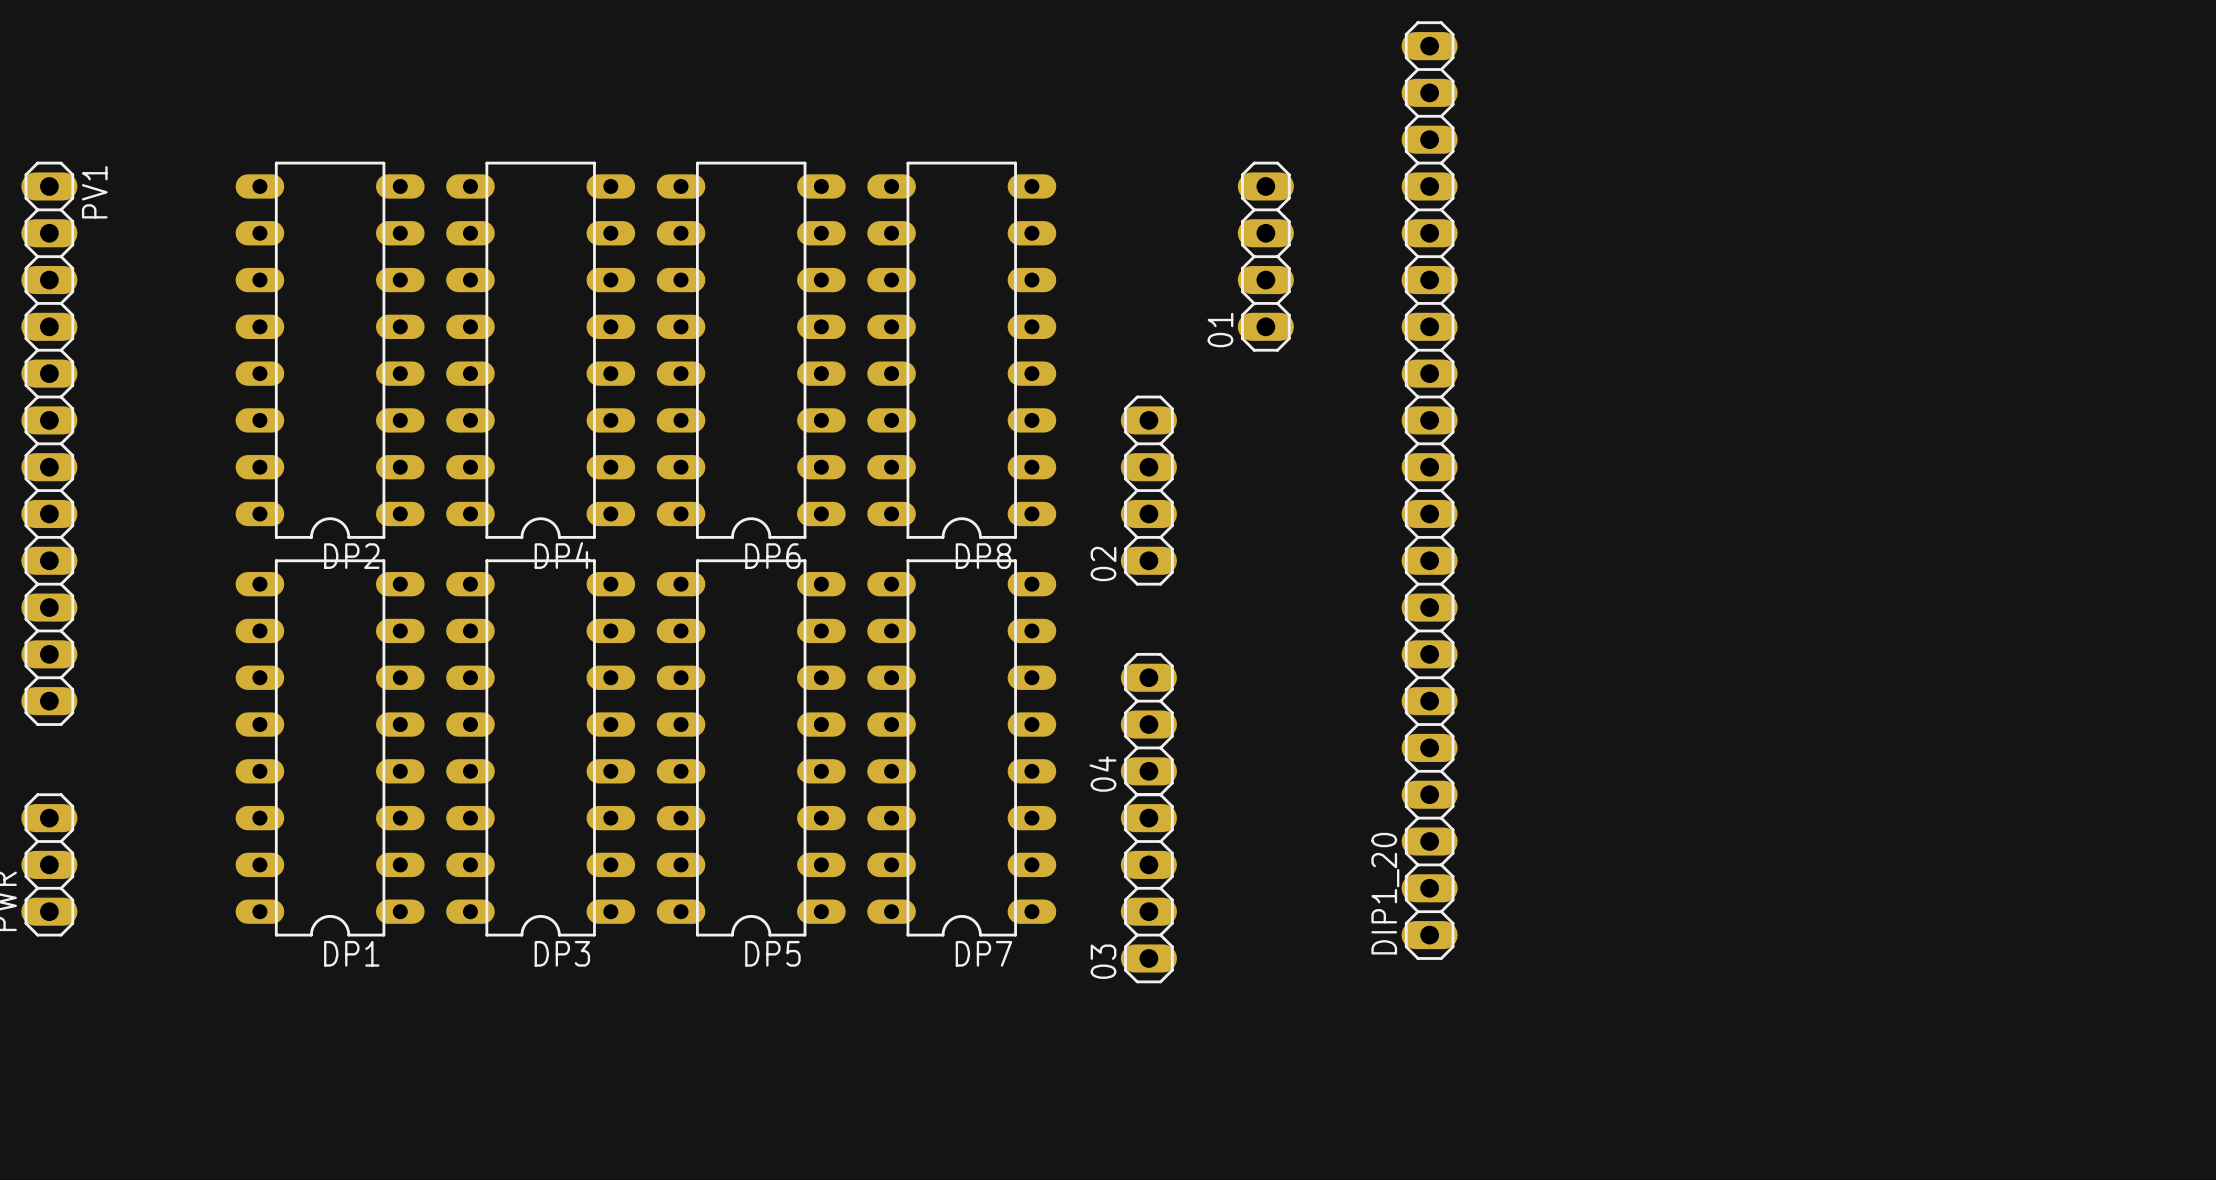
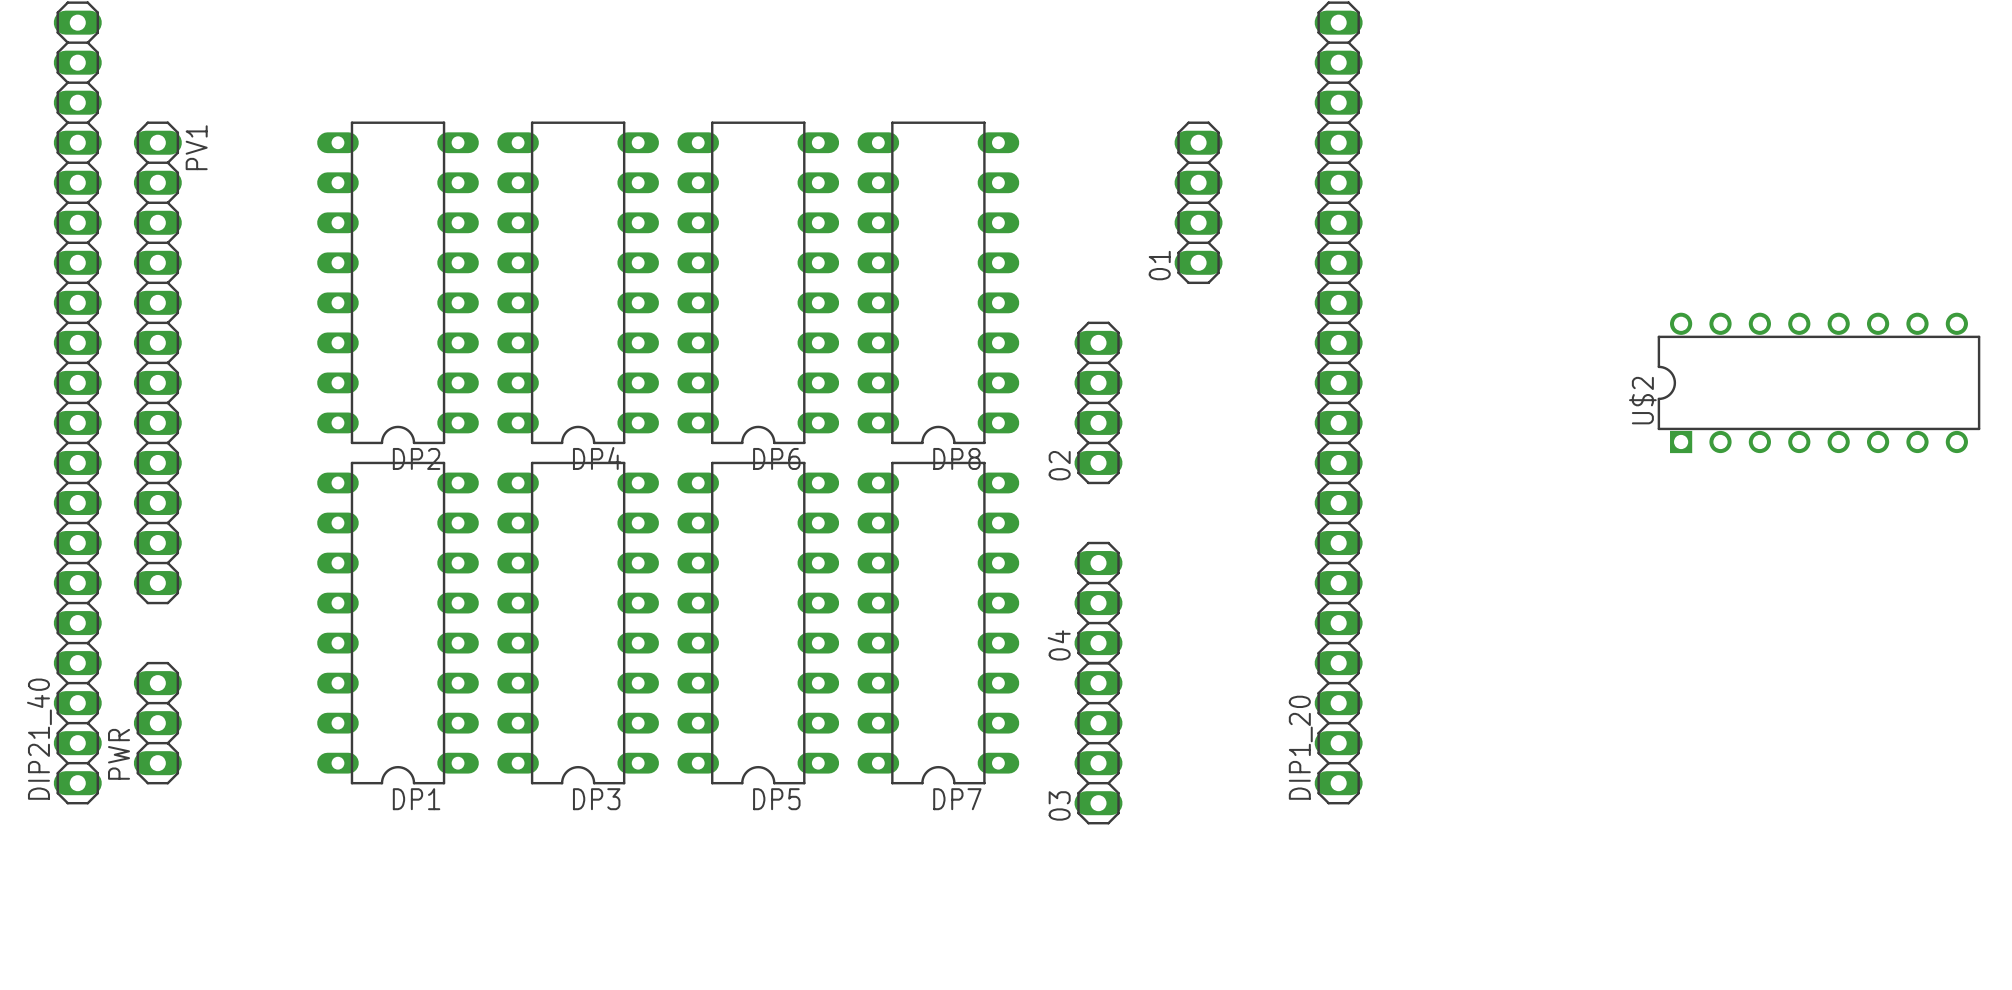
U$2: none -> (1818, 382)

